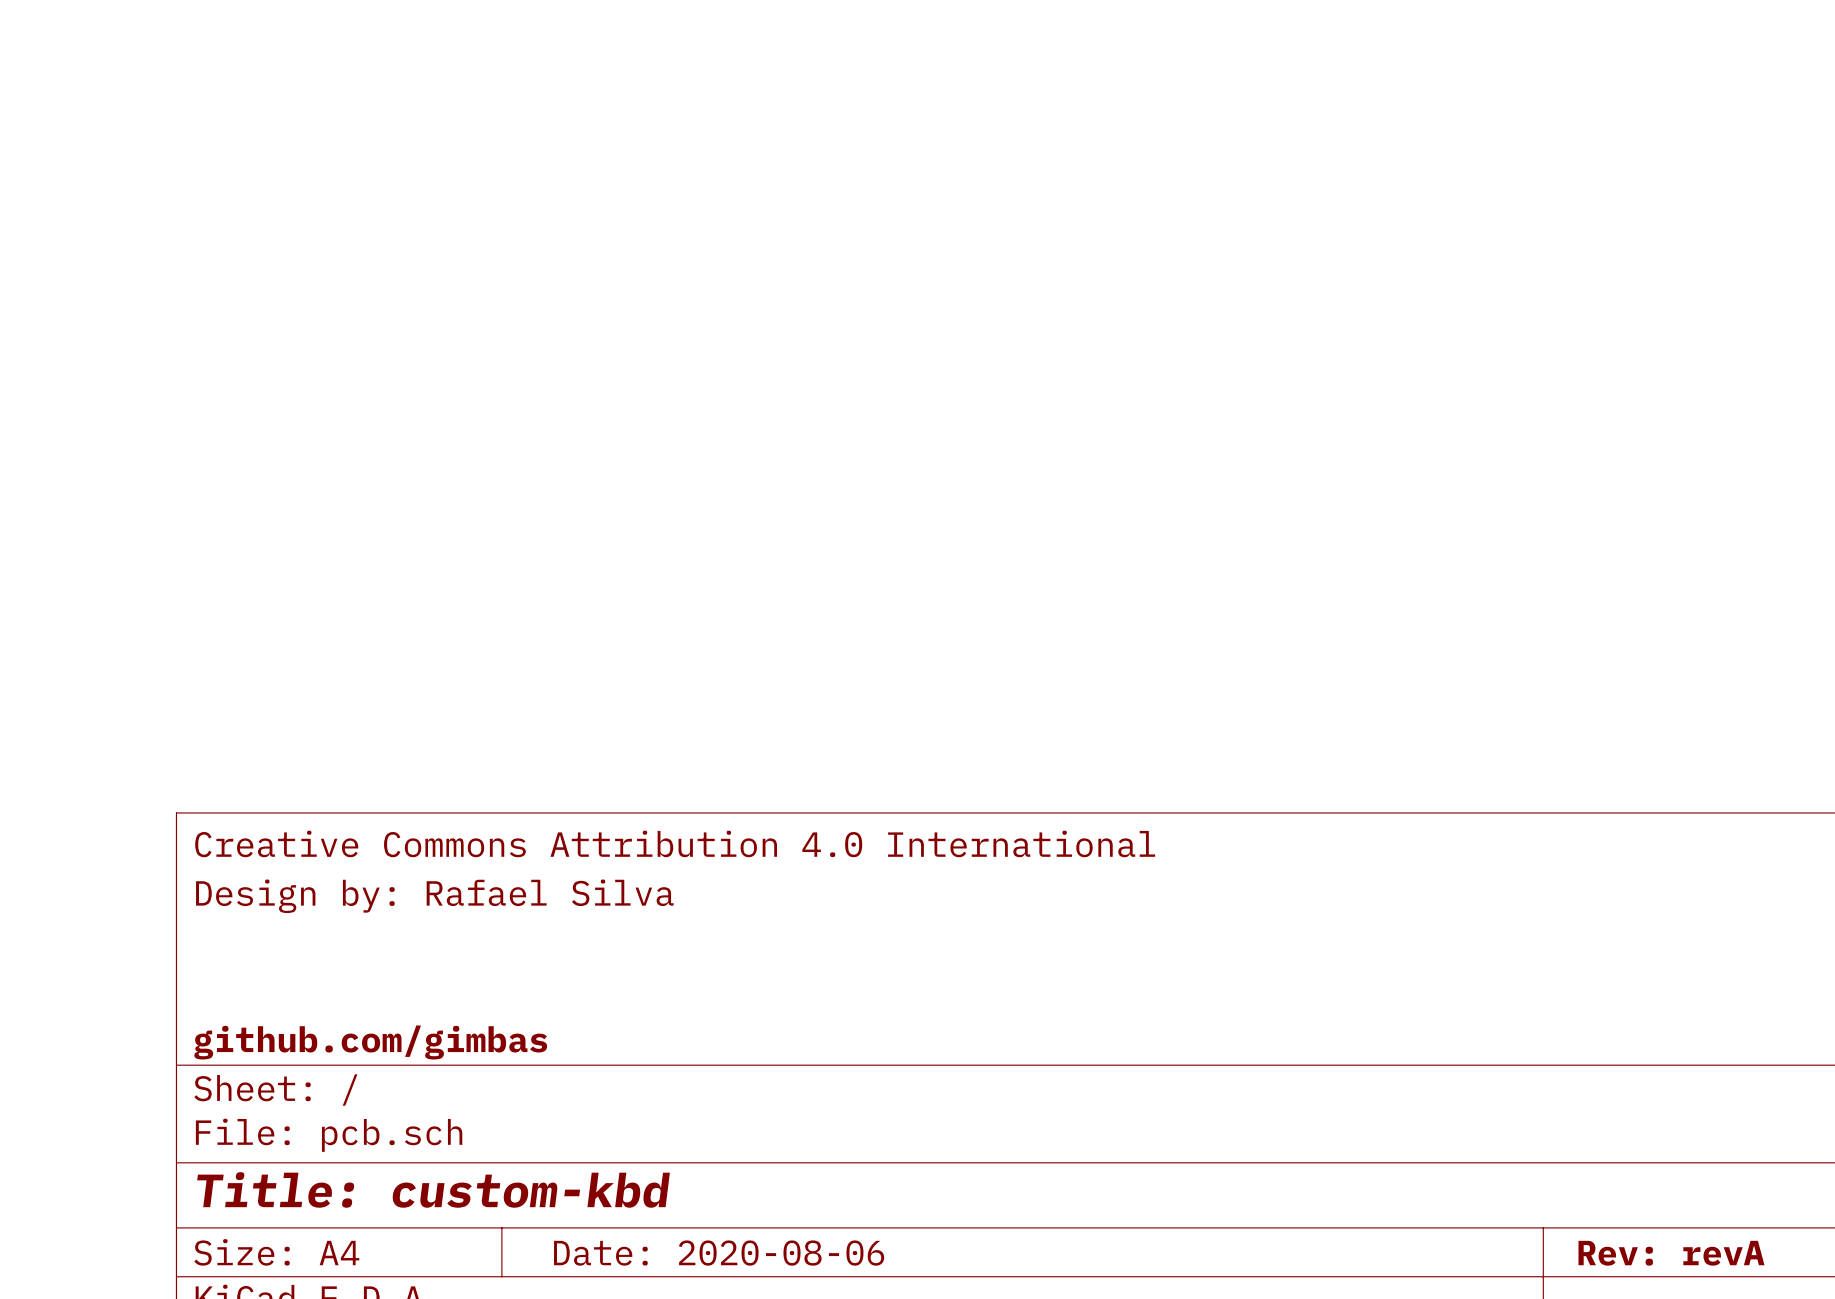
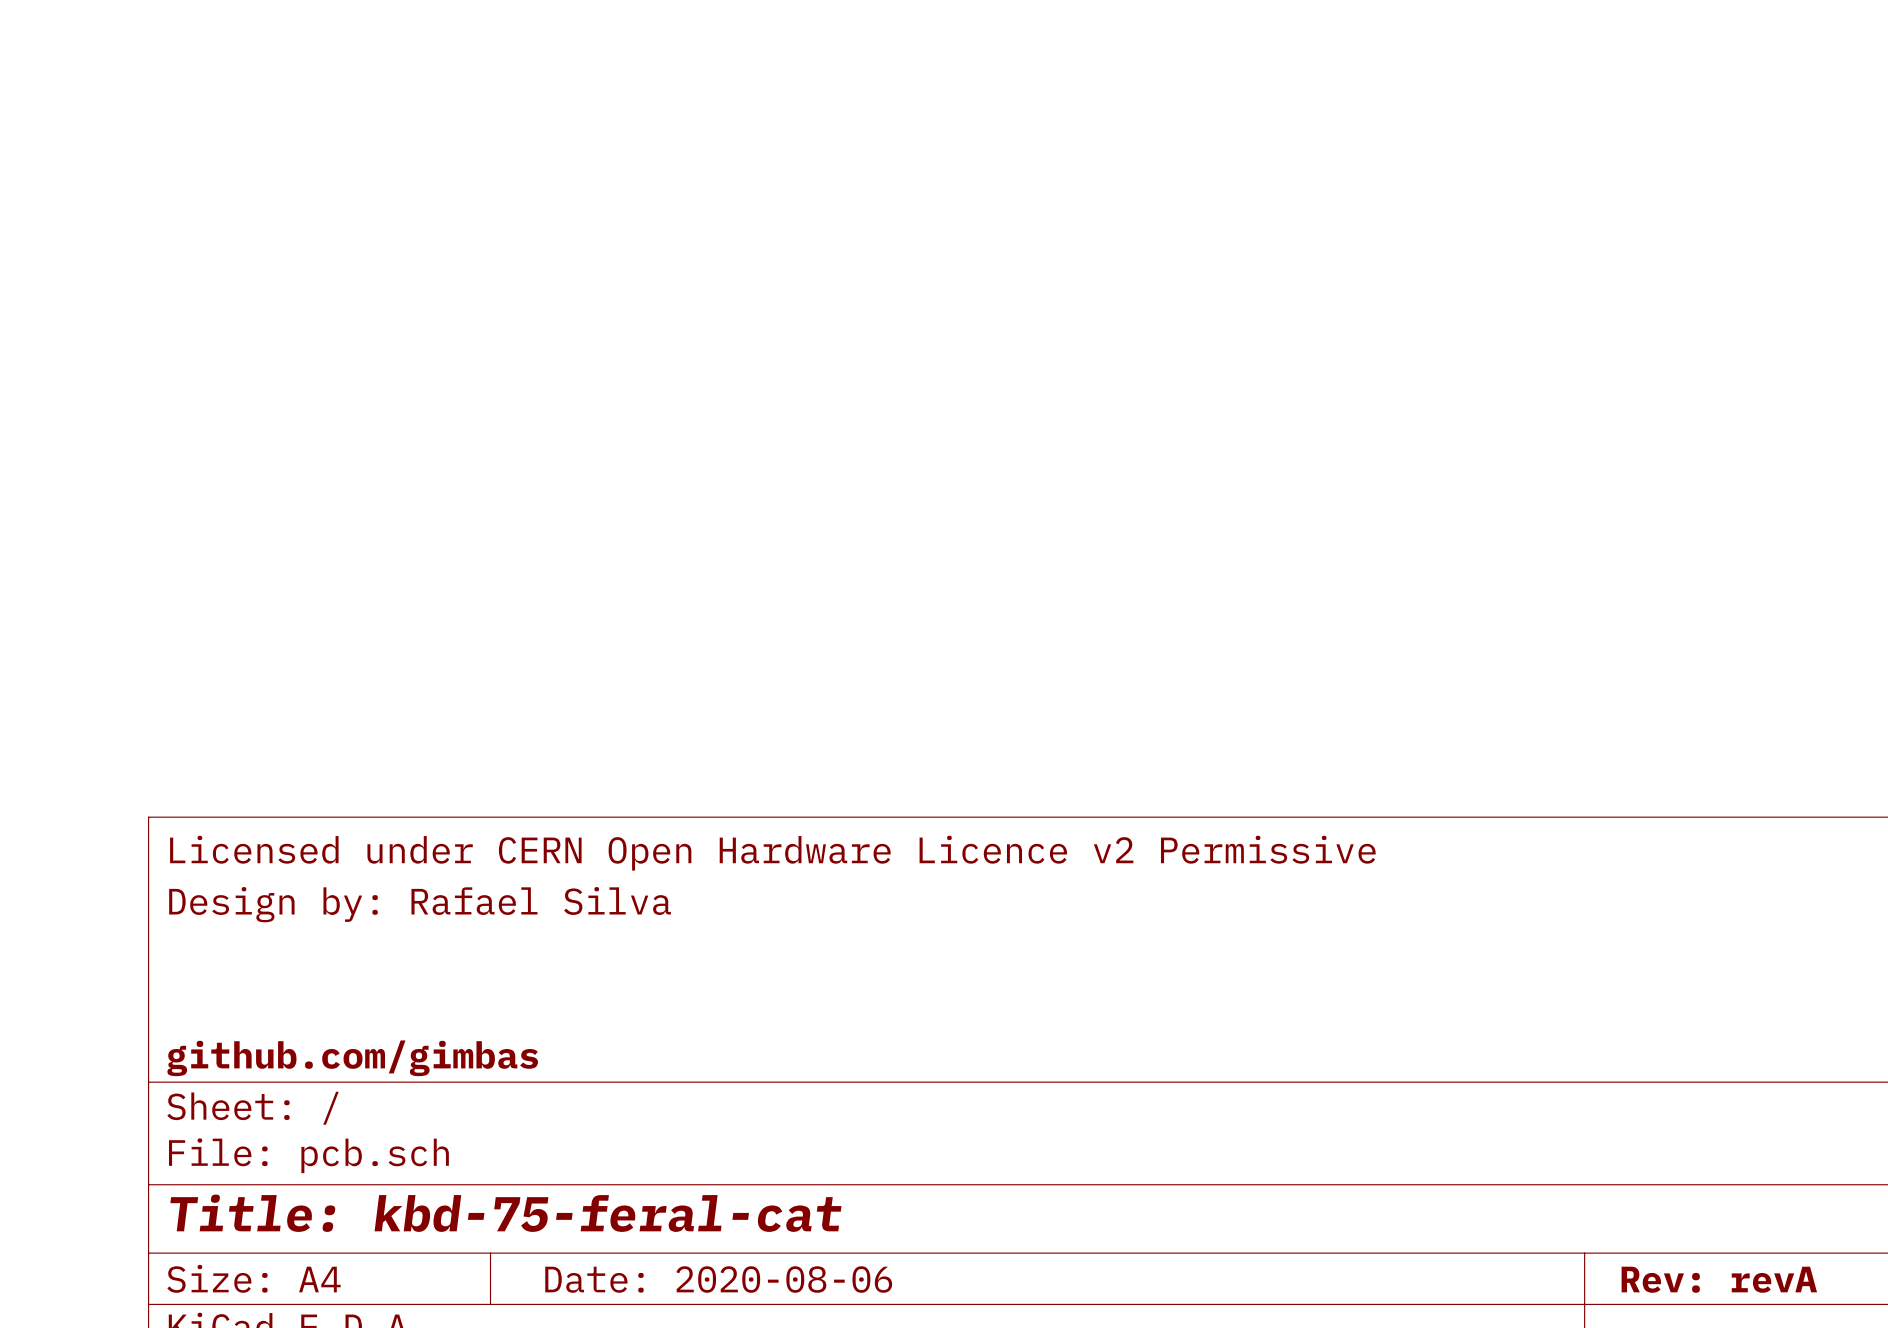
title block: Creative Commons Attribution 4.0 International (675, 843) -> Licensed under CERN Open Hardware Licence v2 Permissive (772, 853)
title block: Title: custom-kbd (433, 1189) -> Title: kbd-75-feral-cat (505, 1213)

